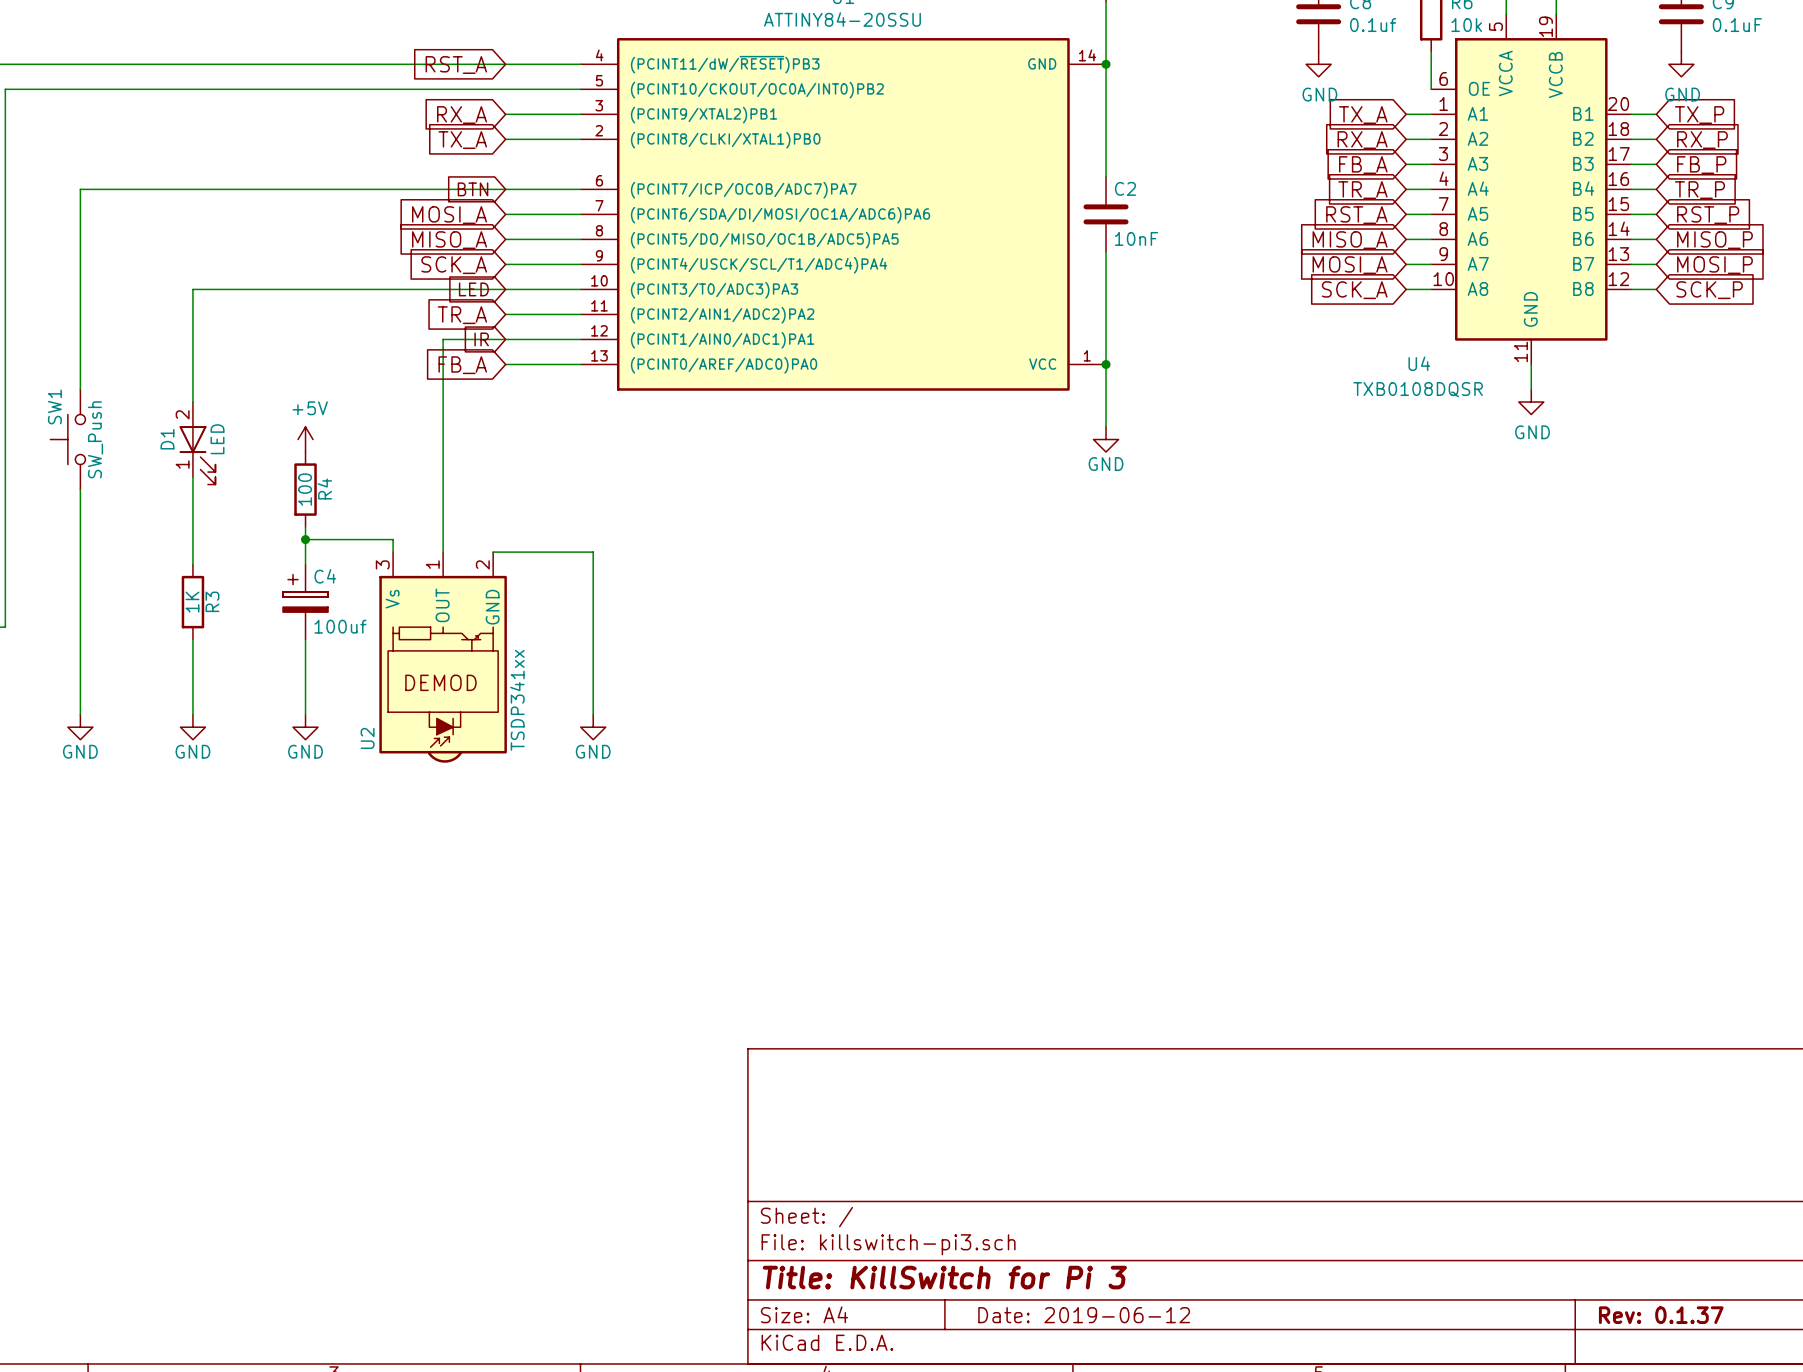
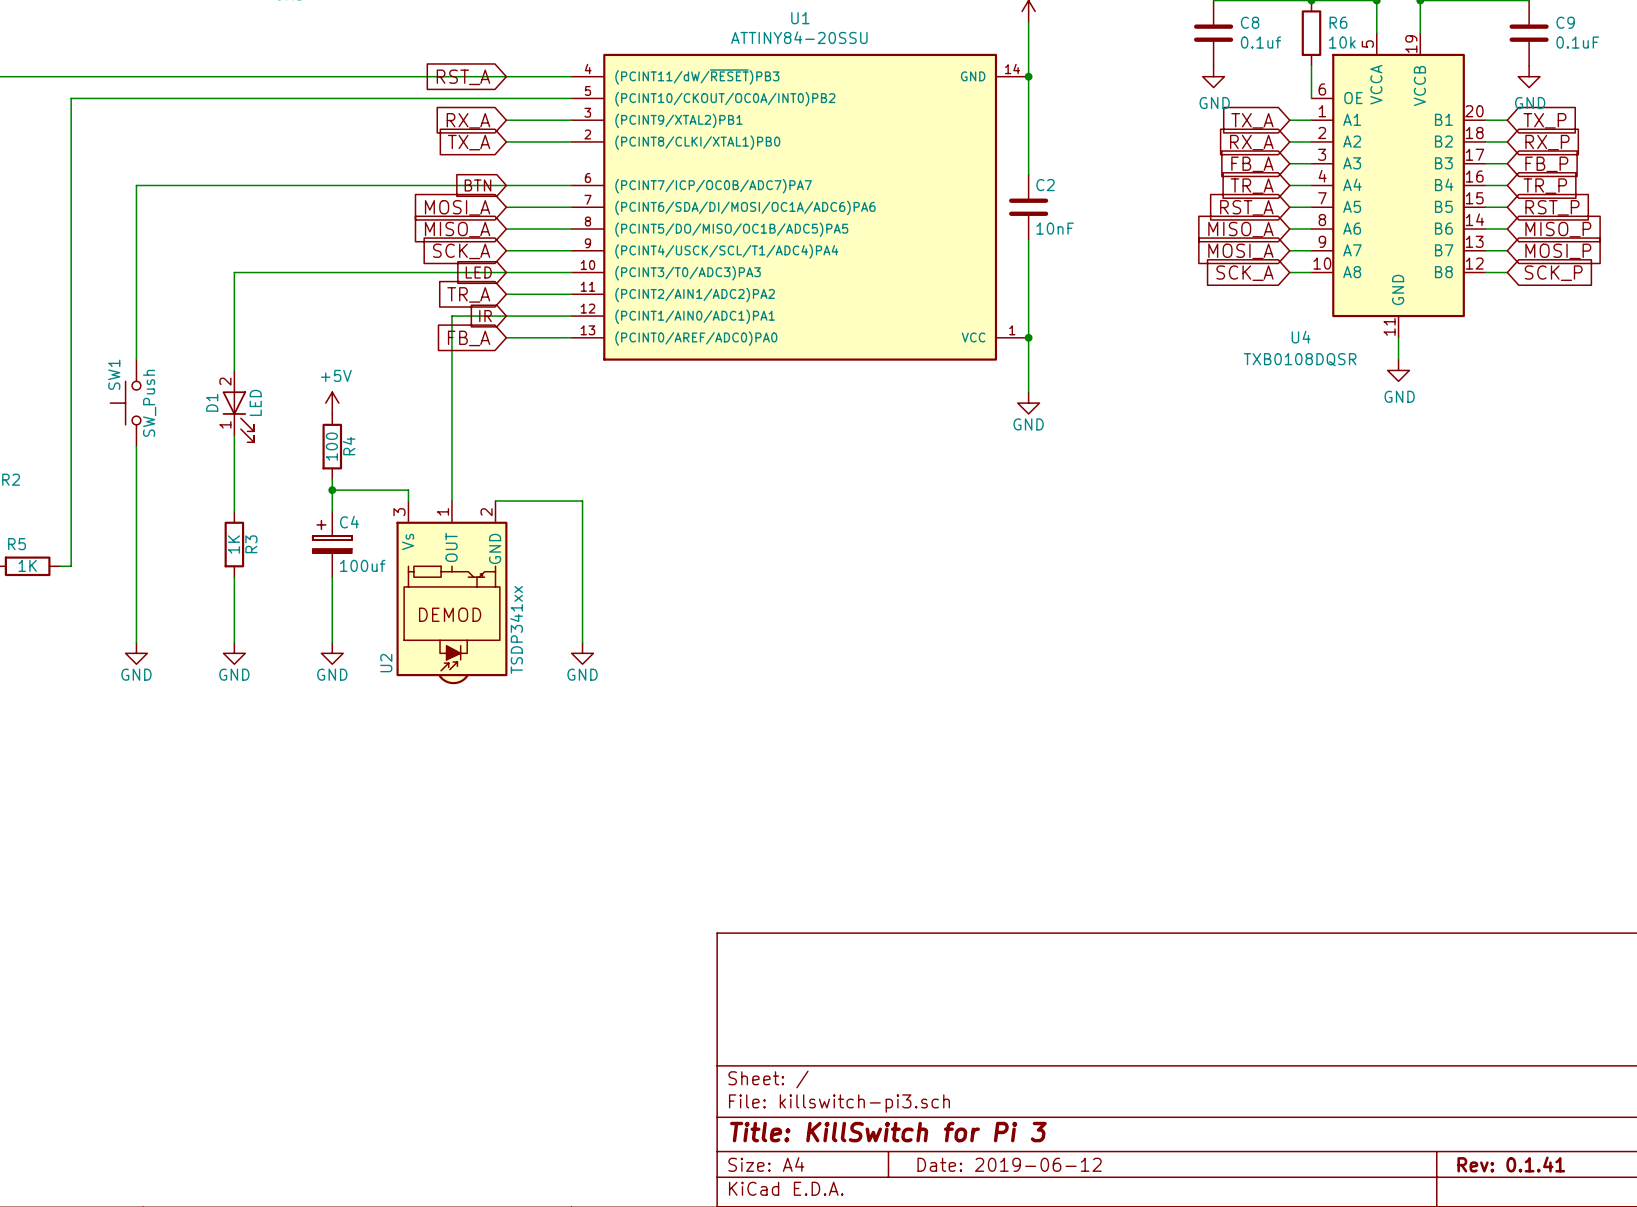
title block: Rev: 0.1.37 (1661, 1315) -> Rev: 0.1.41 (1511, 1164)

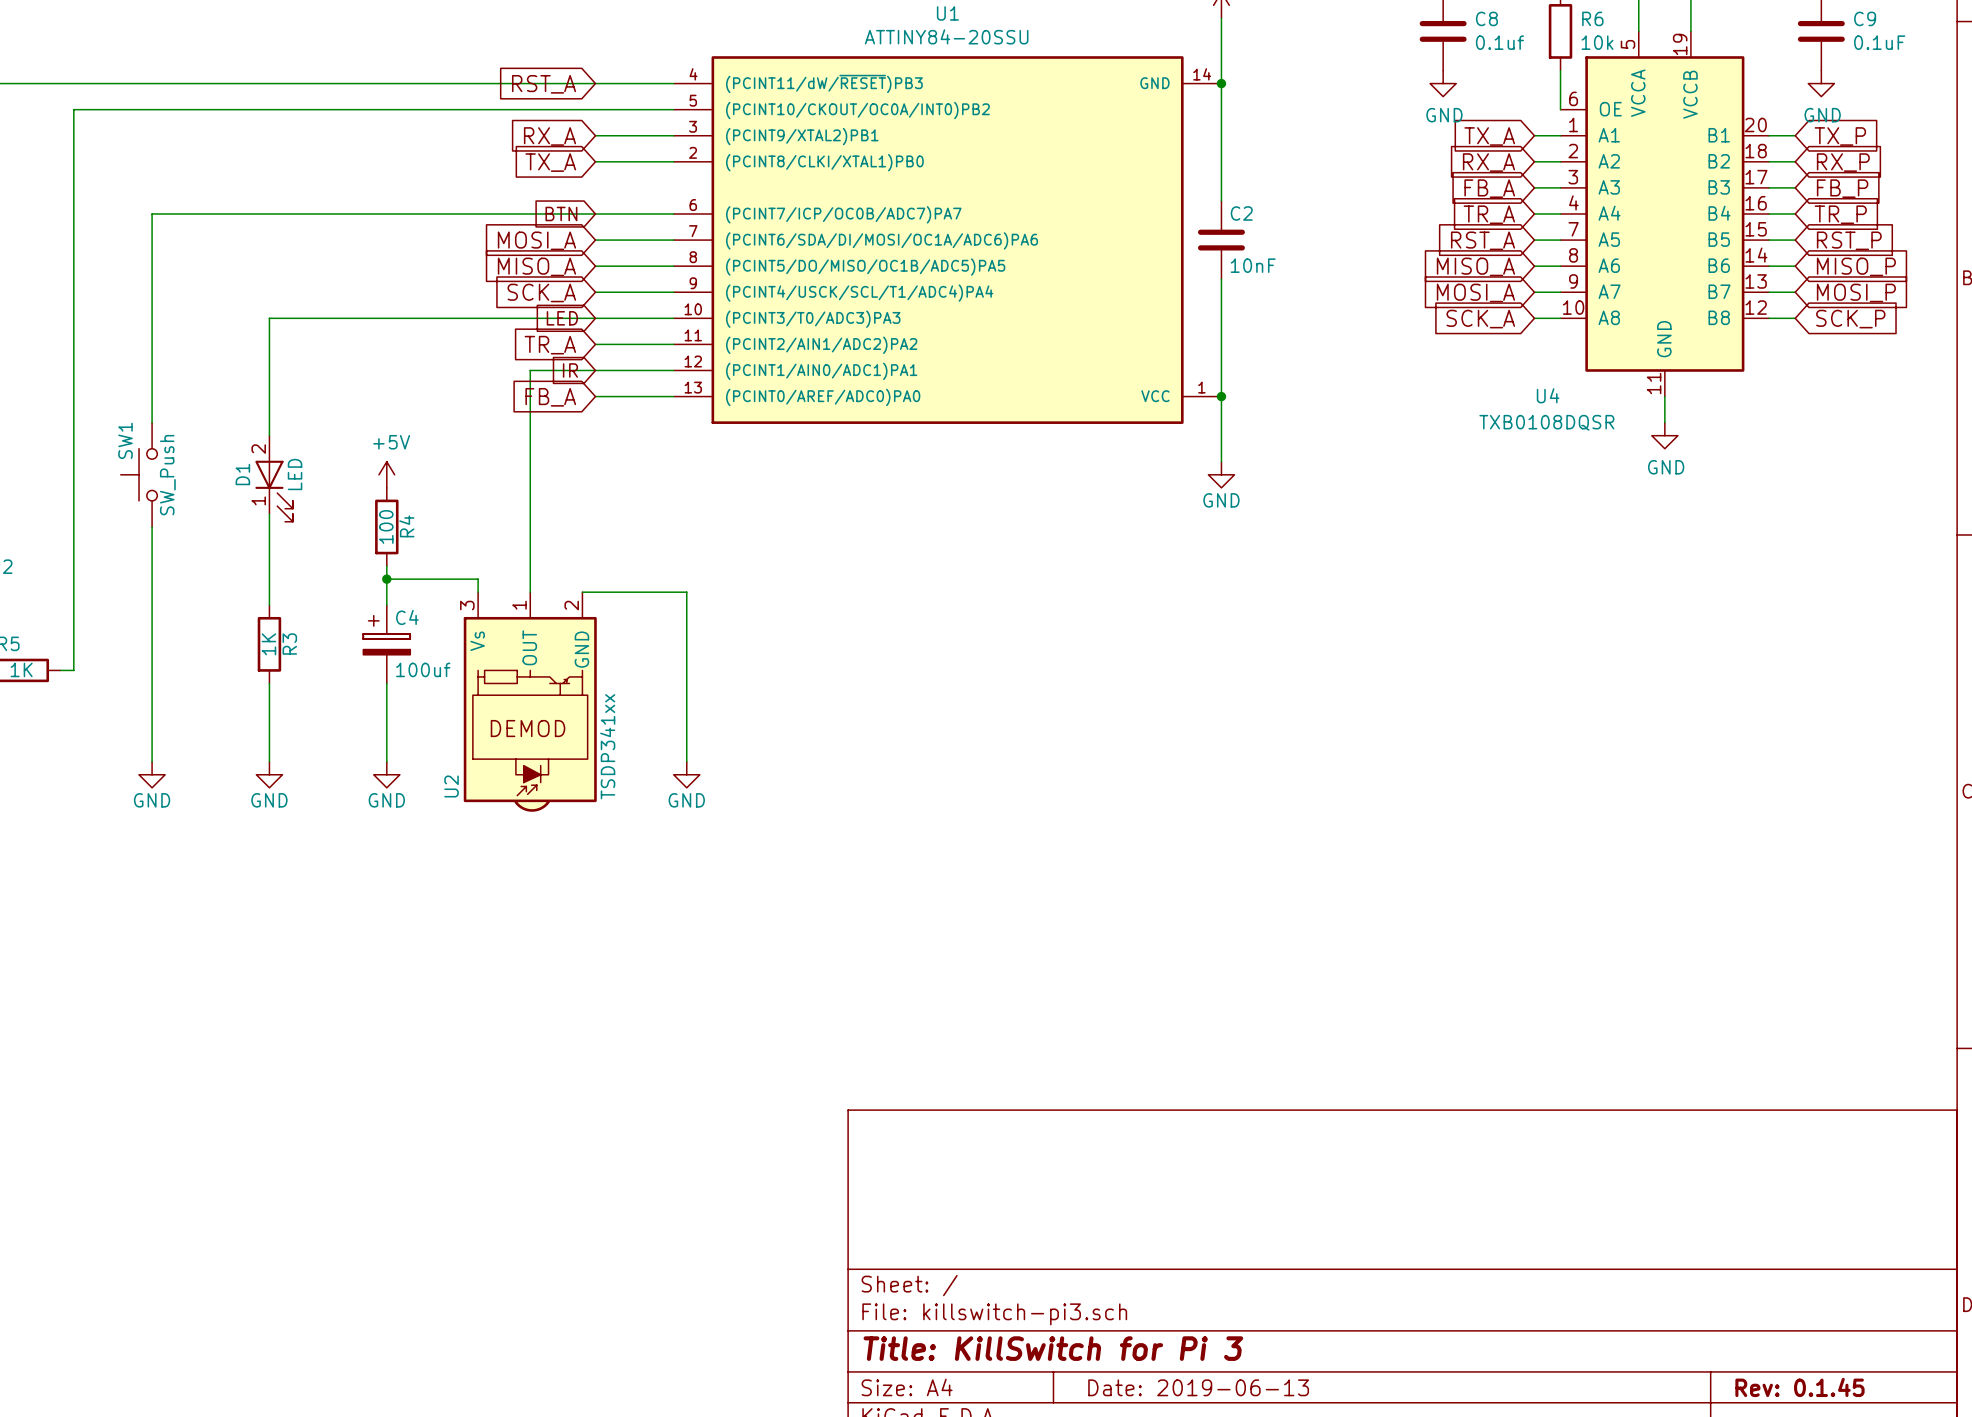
title block: Date: 2019-06-12 (1009, 1164) -> Date: 2019-06-13 (1198, 1387)
title block: Rev: 0.1.41 (1511, 1164) -> Rev: 0.1.45 (1799, 1387)

